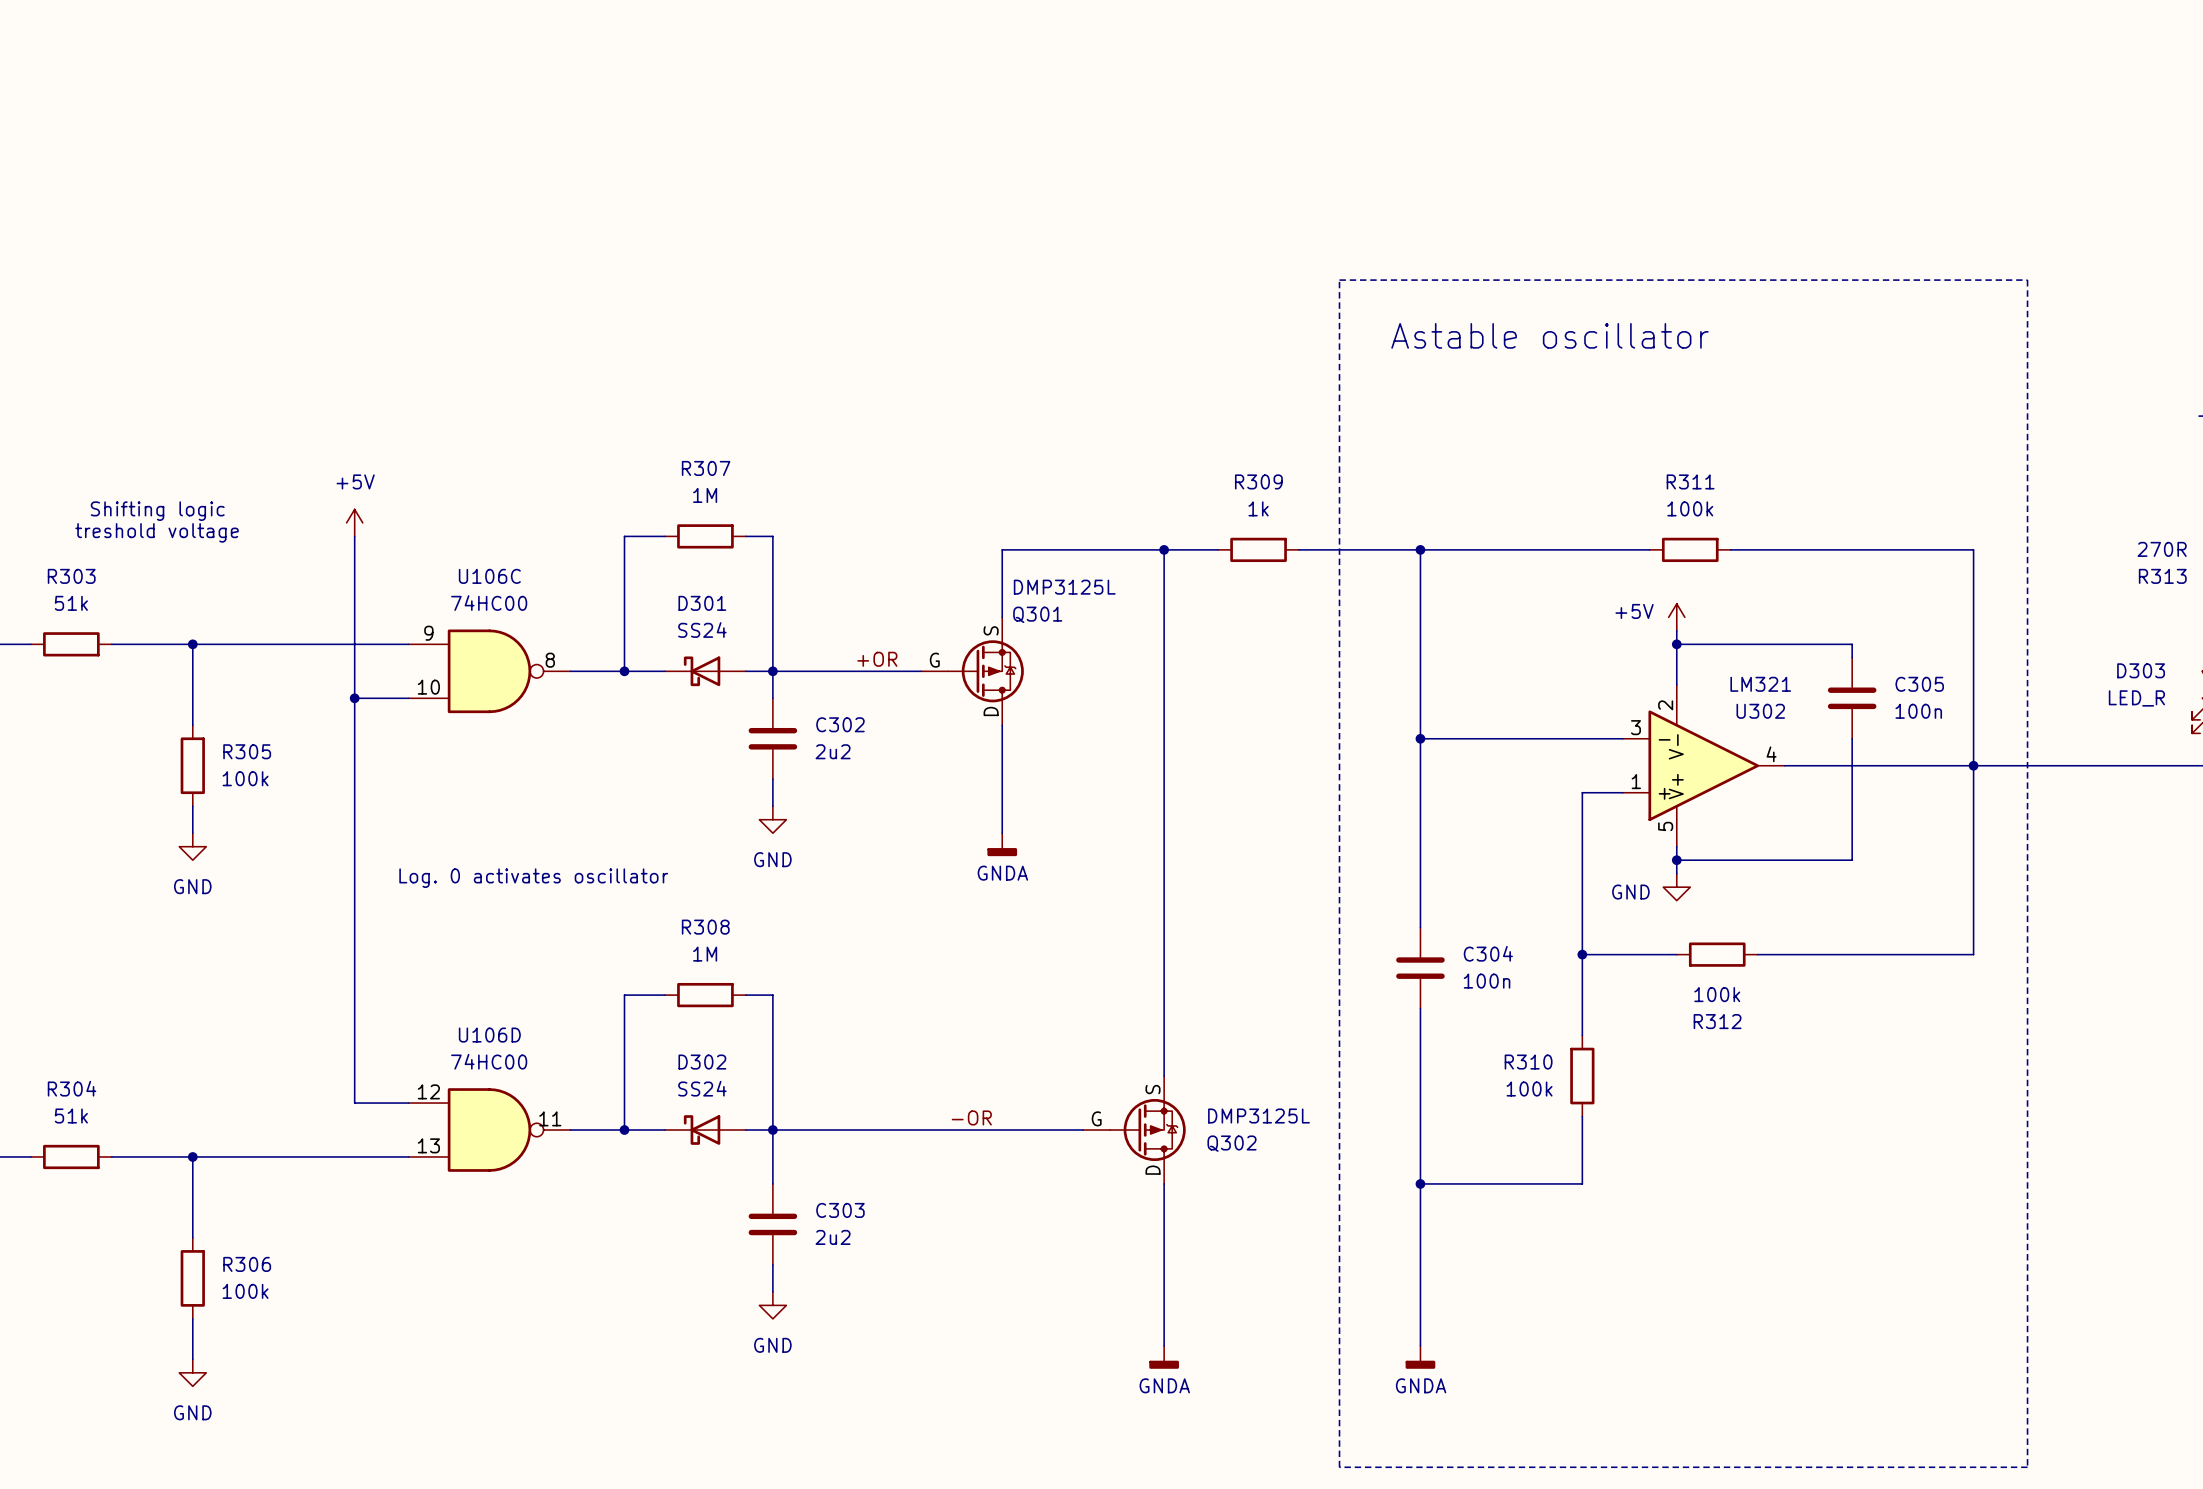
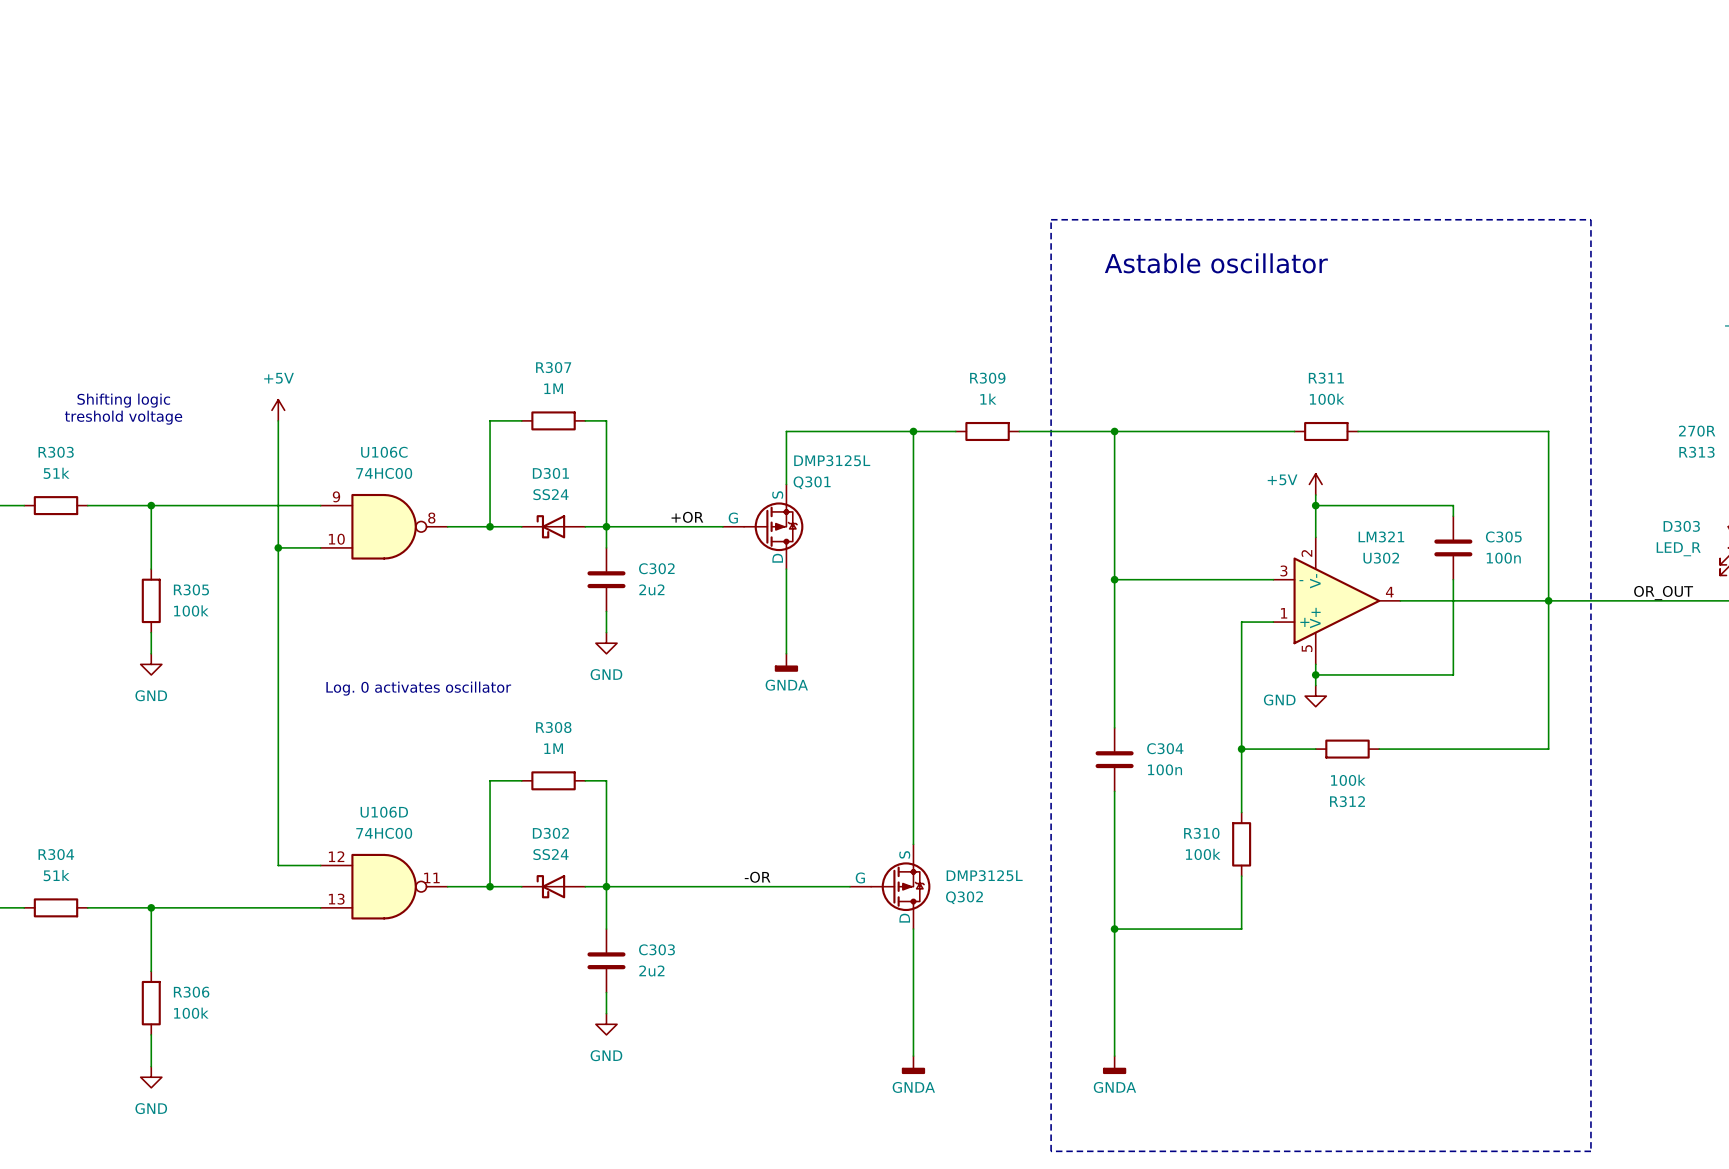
label: none -> OR_OUT (1663, 593)

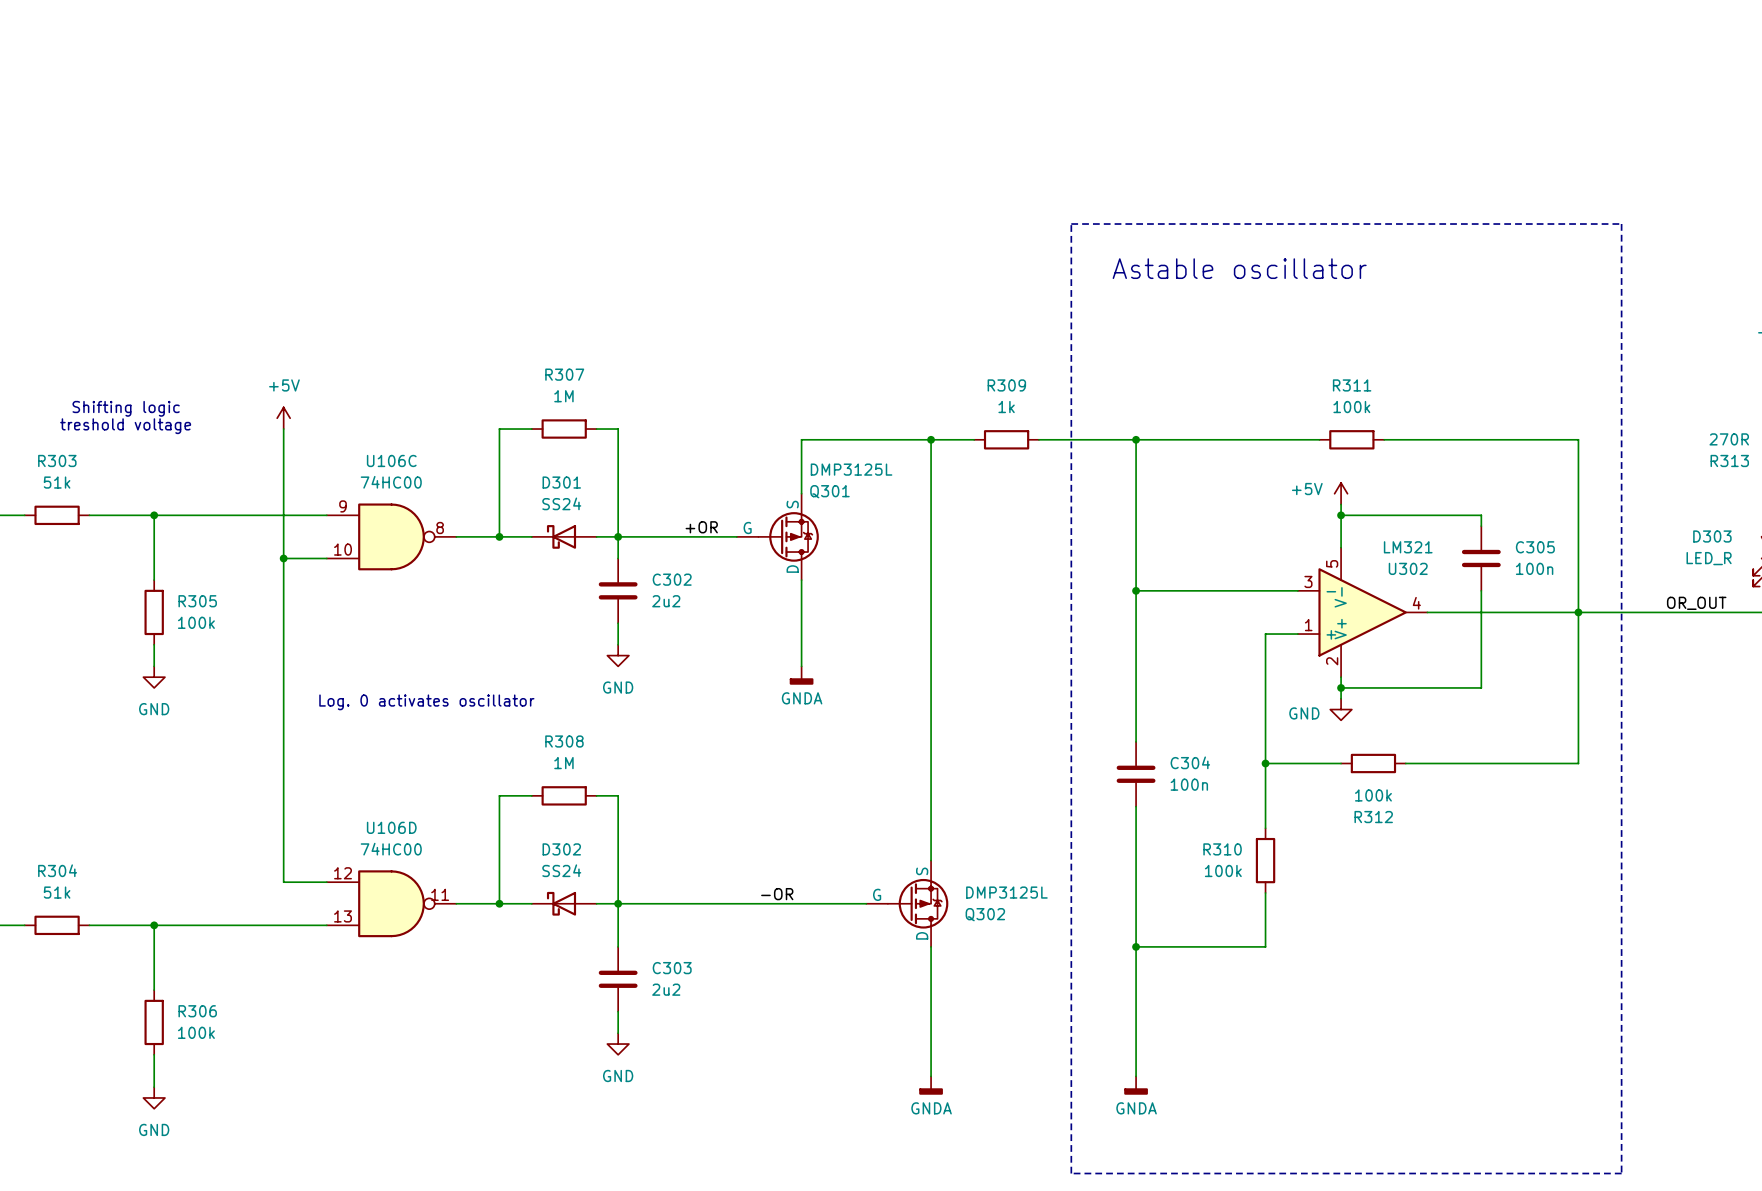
U302 pin number: 2 (1306, 553) -> 5 (1332, 563)
U302 pin number: 5 (1307, 648) -> 2 (1332, 661)

